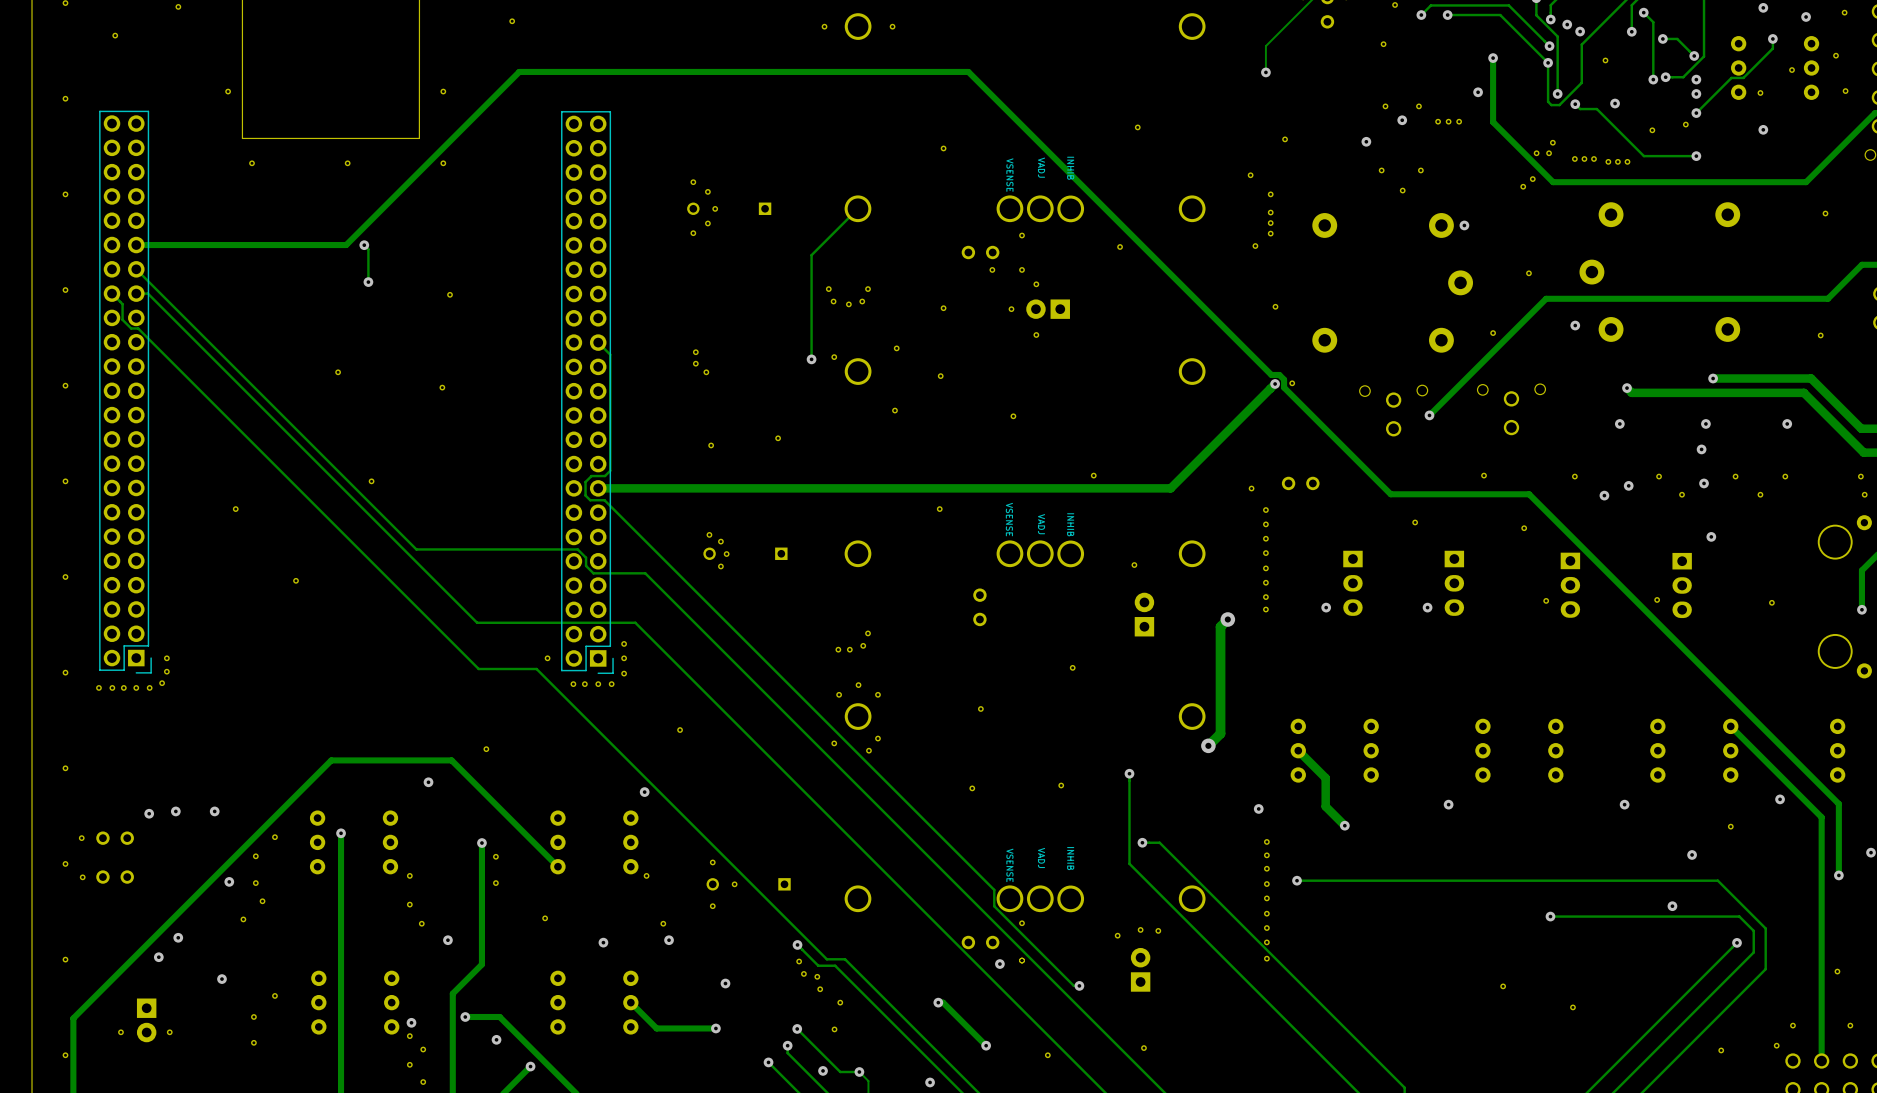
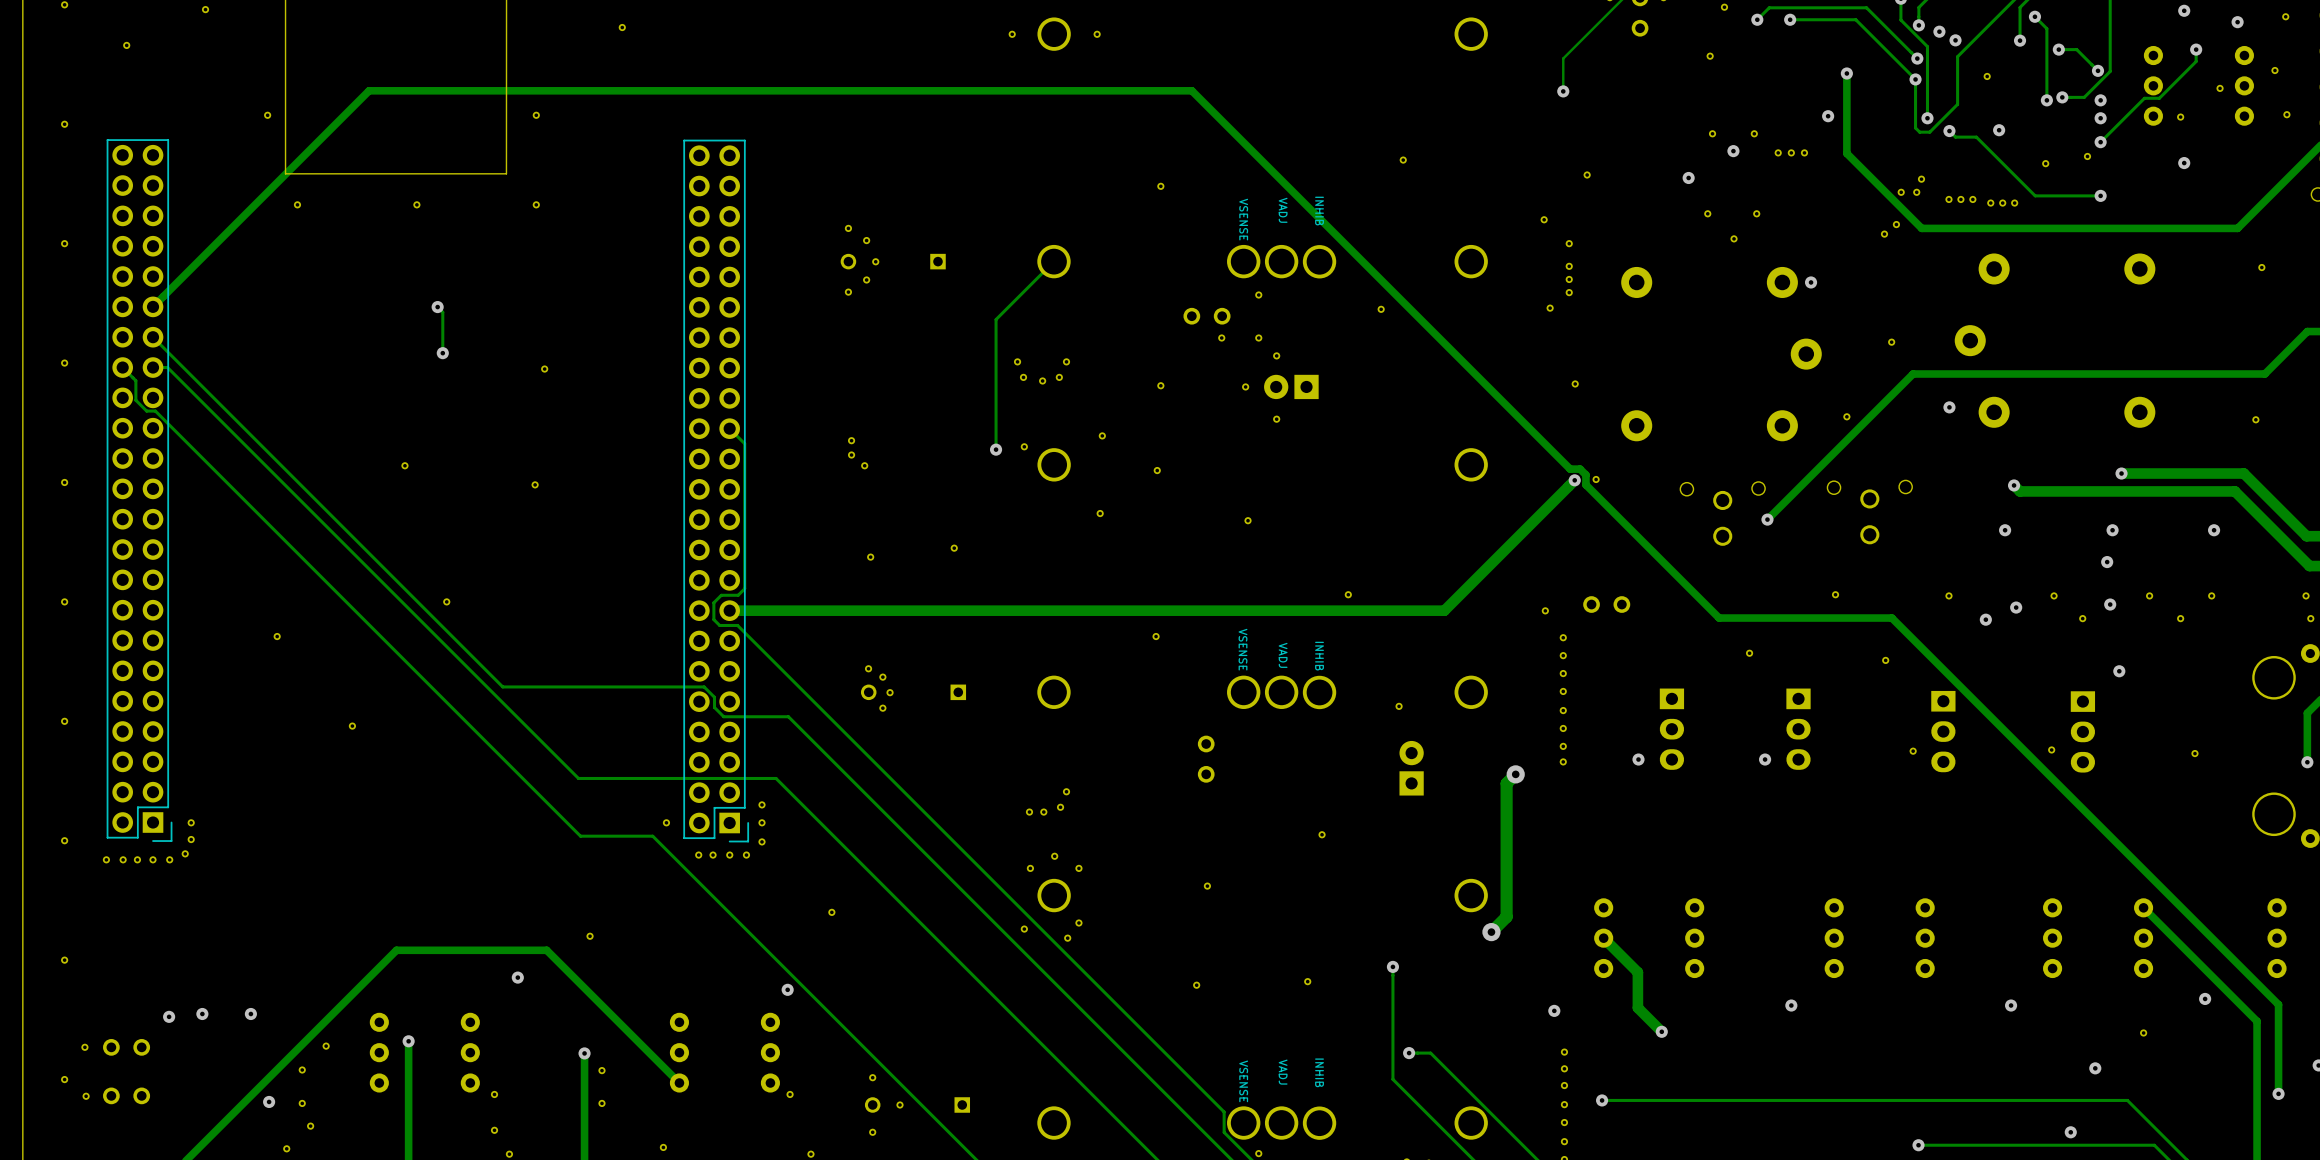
track: (519, 71) (346, 245) (136, 245) -> (631, 90) (369, 90) (153, 306)

